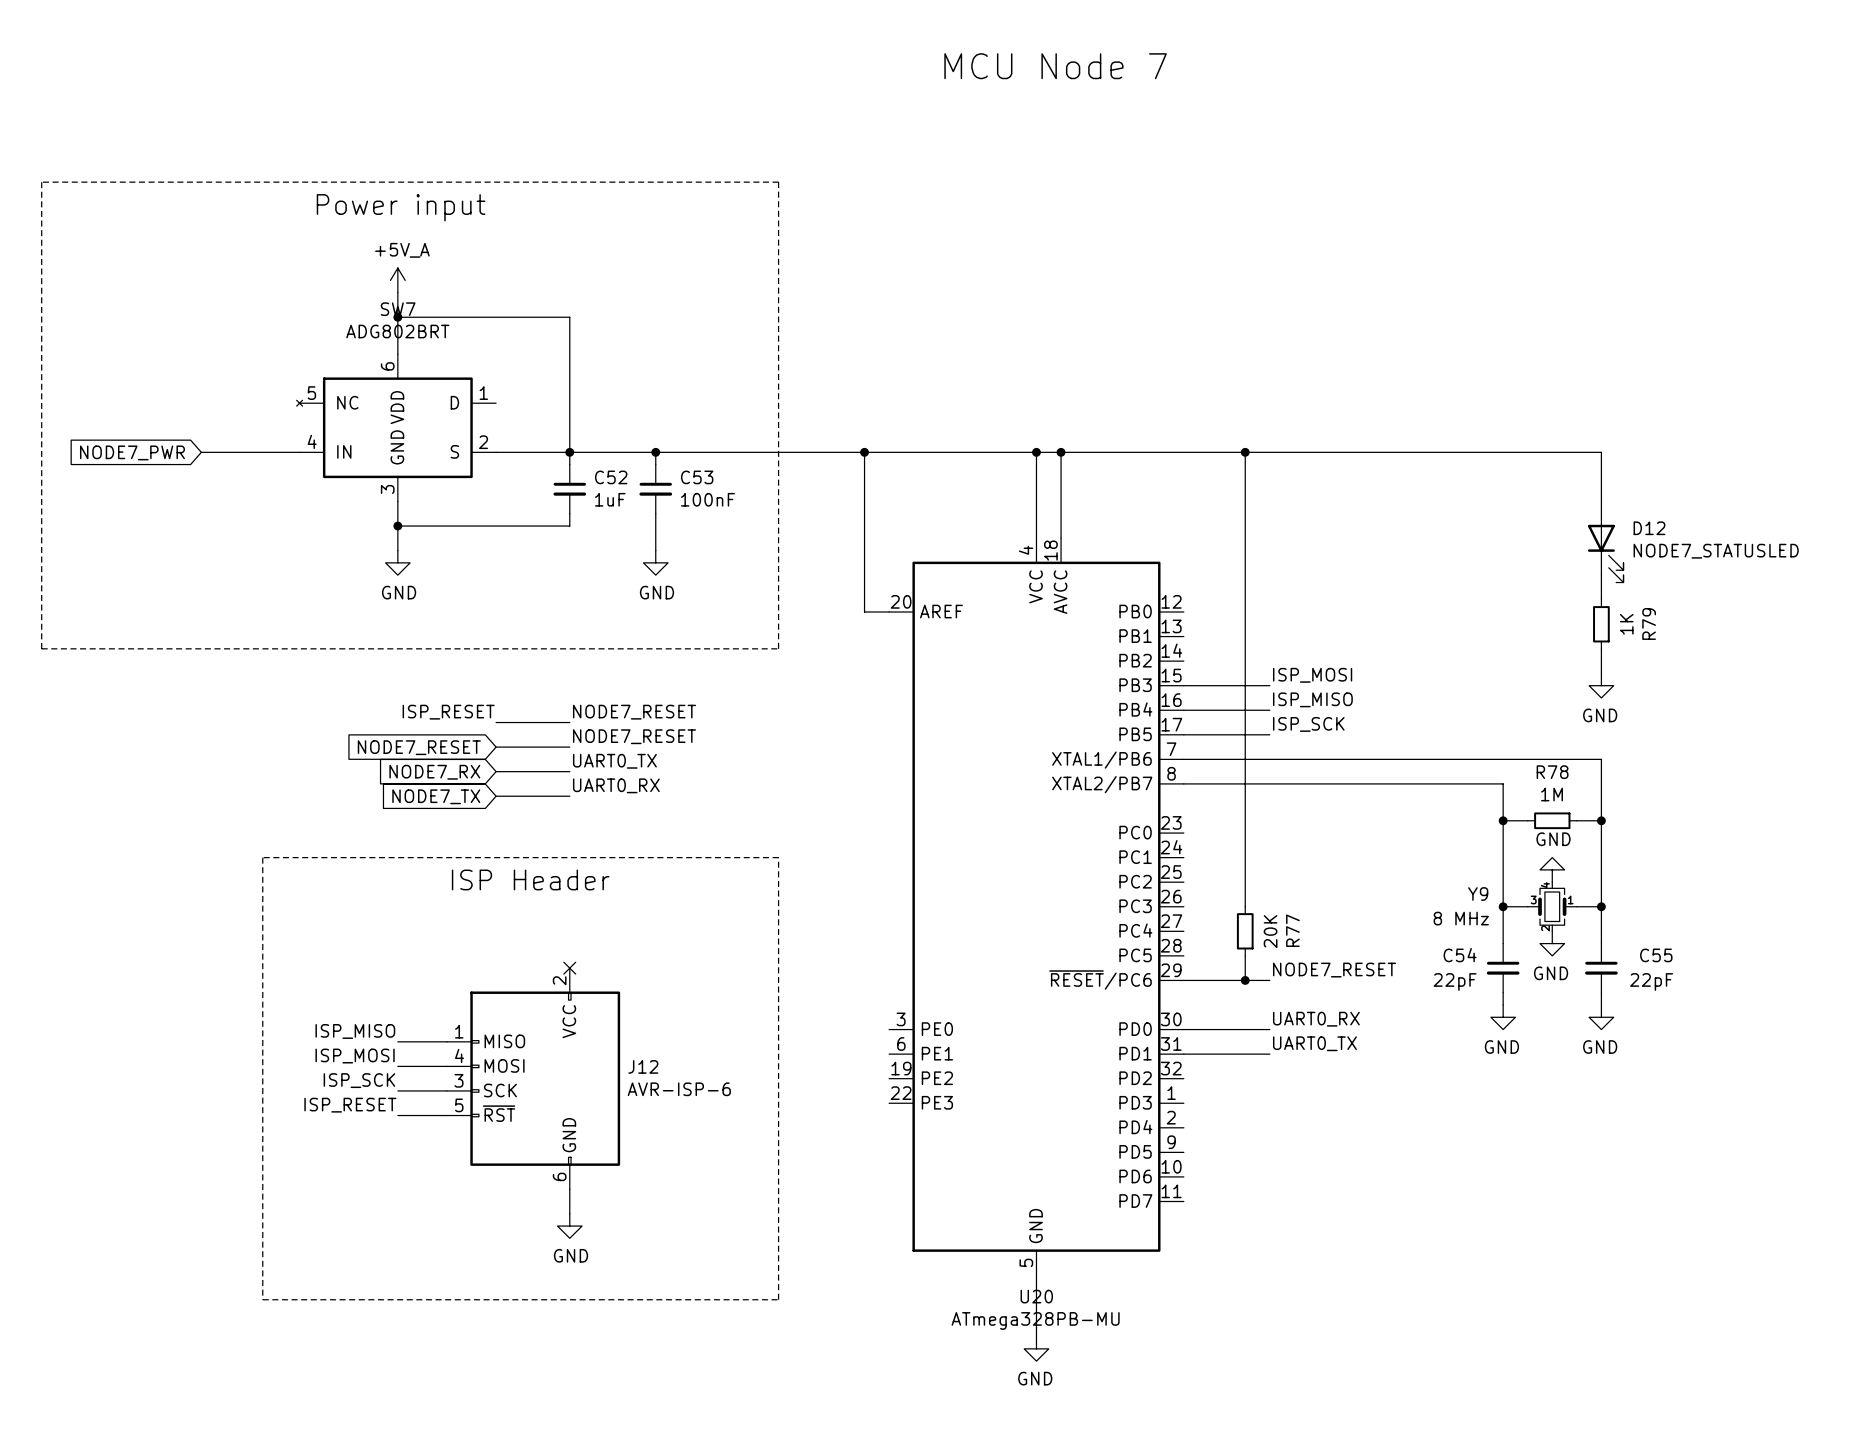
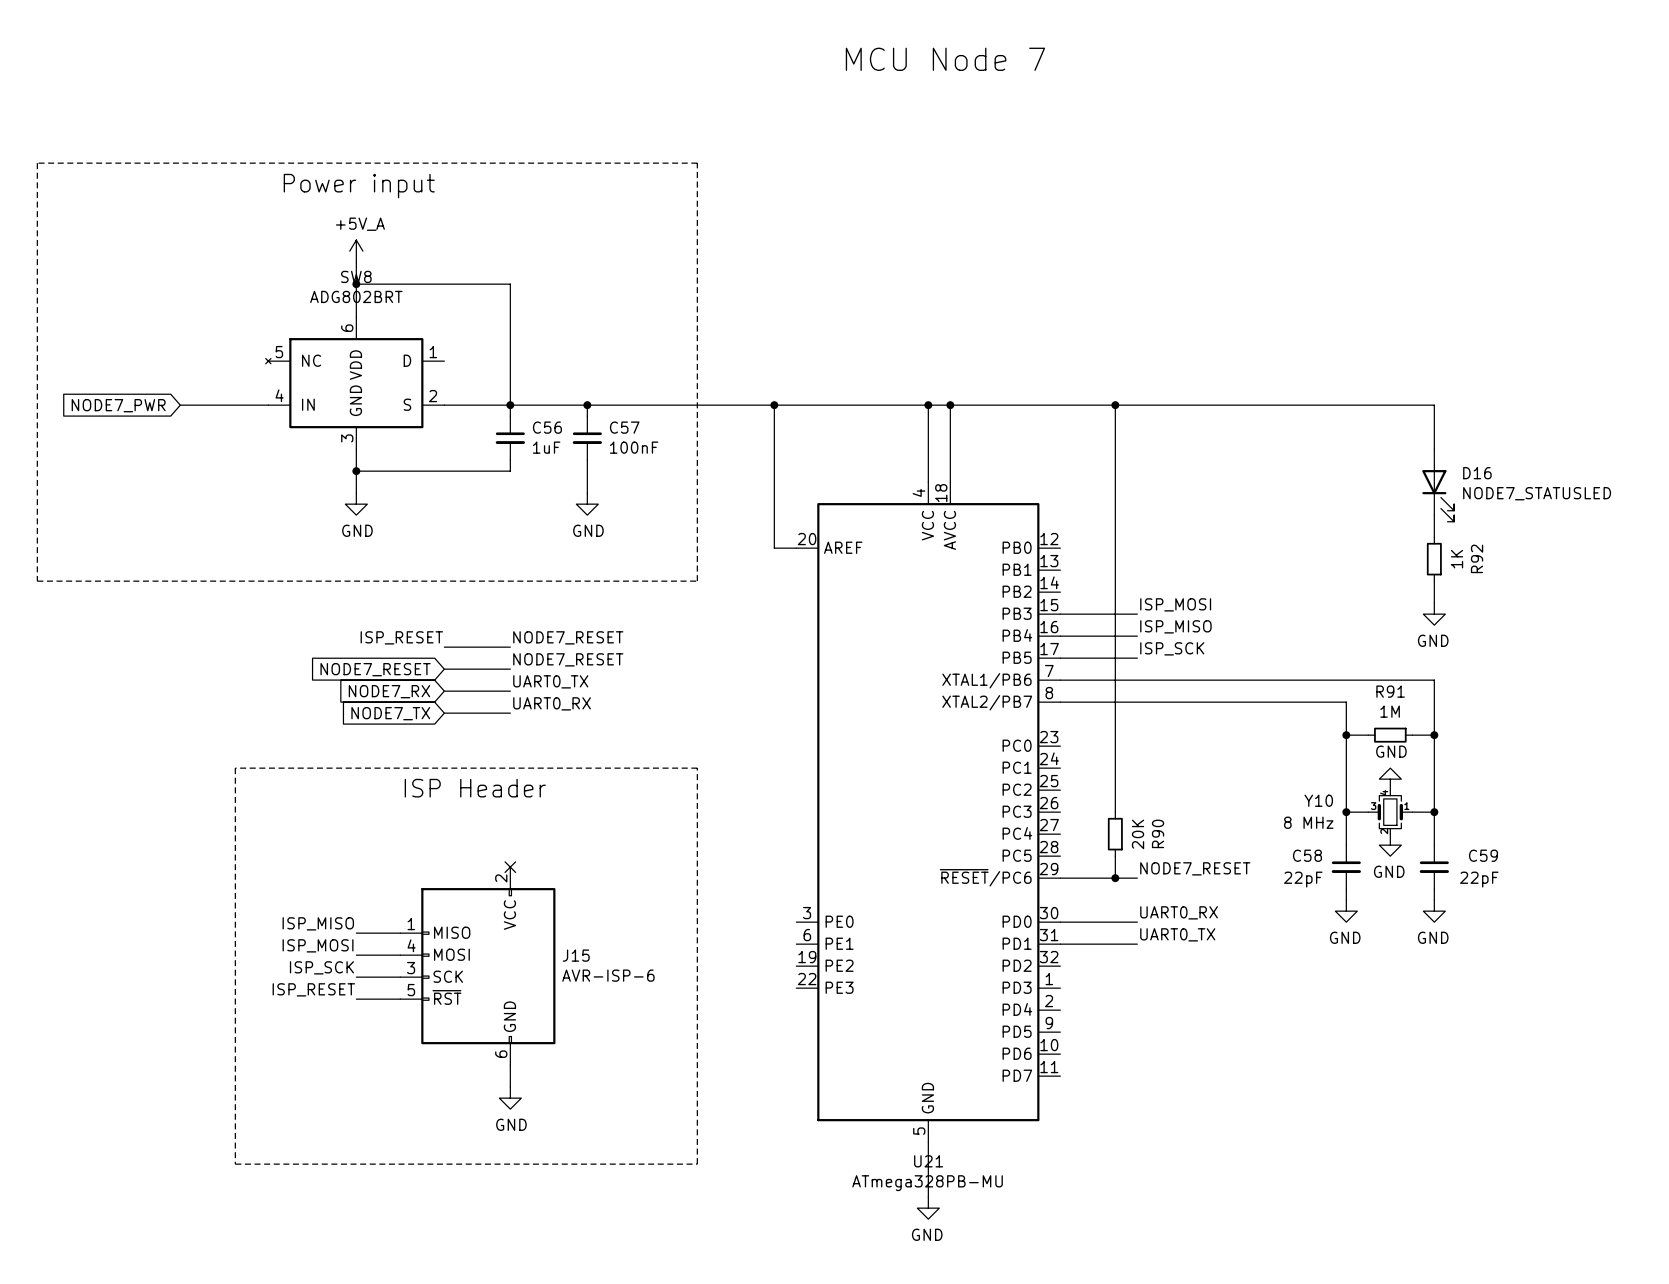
SW7 name: SW7 (398, 309) -> SW8 (356, 276)
C52 name: C52 (611, 477) -> C56 (547, 427)
C53 name: C53 (697, 477) -> C57 (624, 427)
D12 name: D12 (1649, 528) -> D16 (1477, 473)
R79 name: R79 (1649, 623) -> R92 (1477, 558)
R78 name: R78 (1552, 772) -> R91 (1390, 691)
Y9 name: Y9 (1478, 894) -> Y10 (1318, 800)
R77 name: R77 (1292, 930) -> R90 (1158, 833)
C54 name: C54 (1460, 955) -> C58 (1307, 855)
C55 name: C55 (1656, 955) -> C59 (1483, 855)
J12 name: J12 (643, 1066) -> J15 (576, 955)
U20 name: U20 (1036, 1296) -> U21 (928, 1161)

